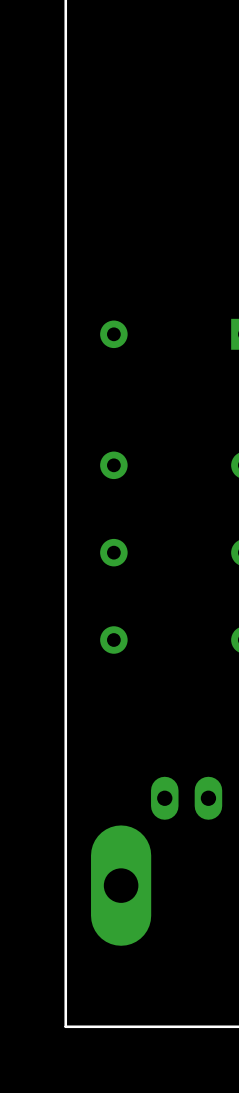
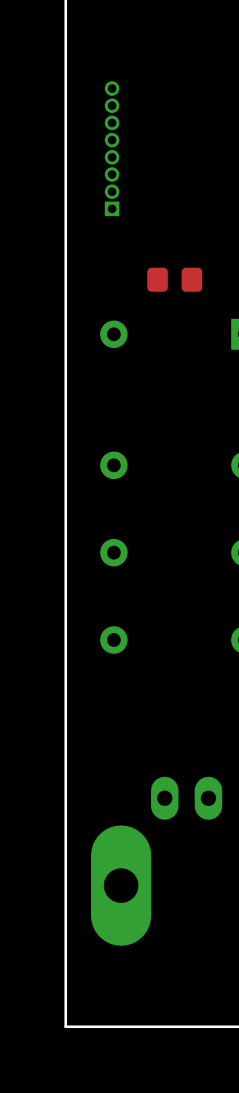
part: none -> (112, 148)
part: none -> (174, 279)

